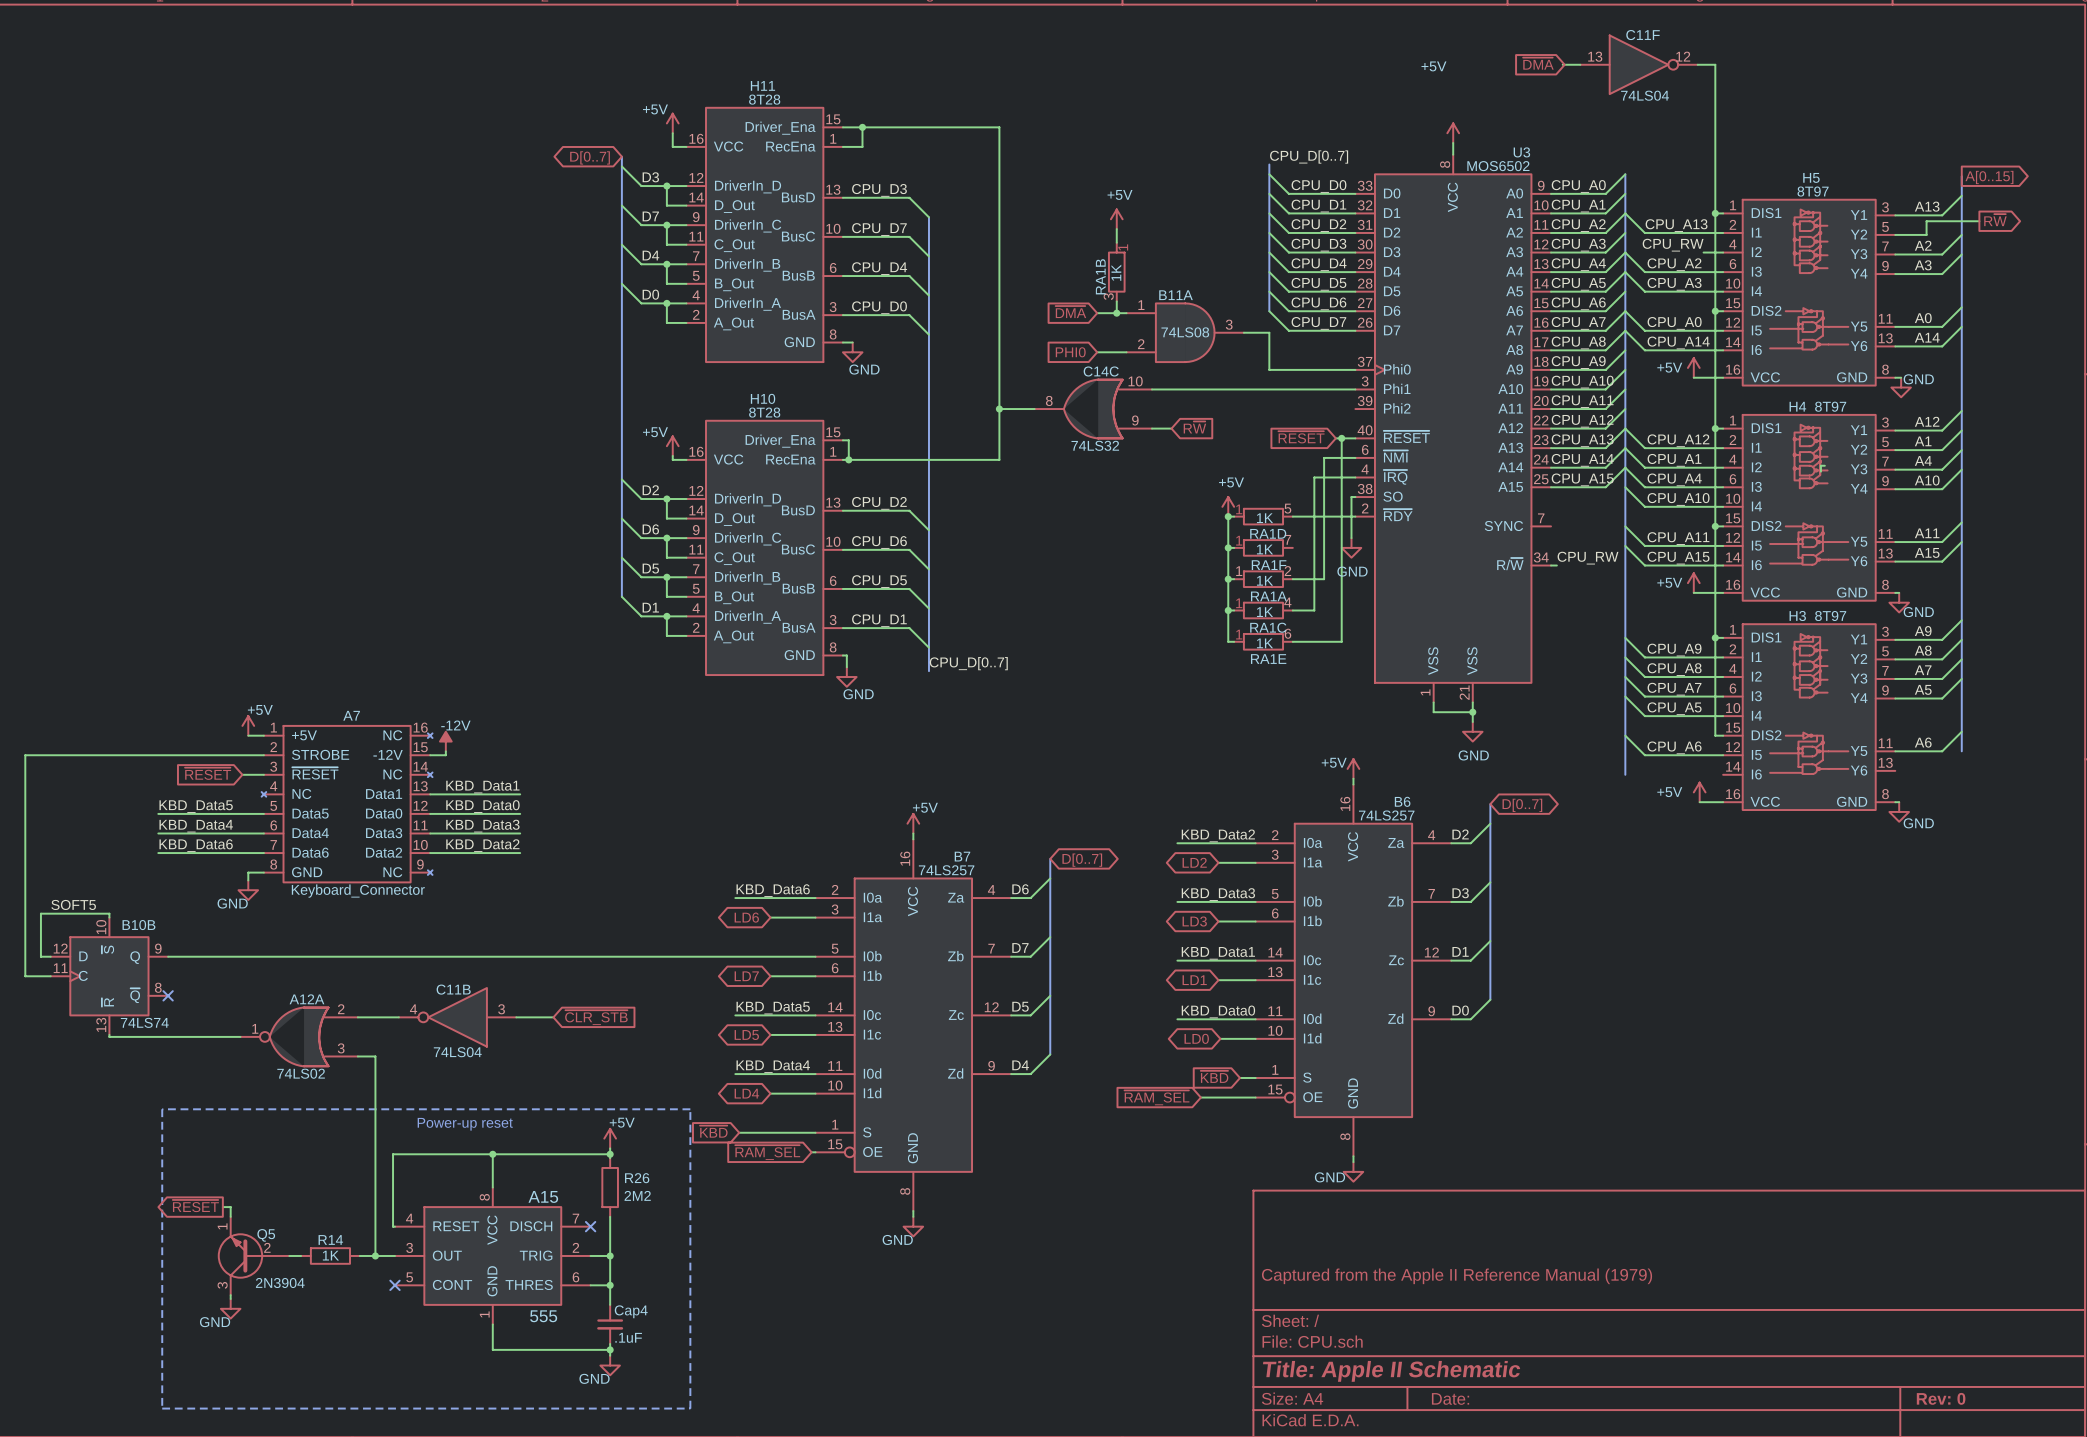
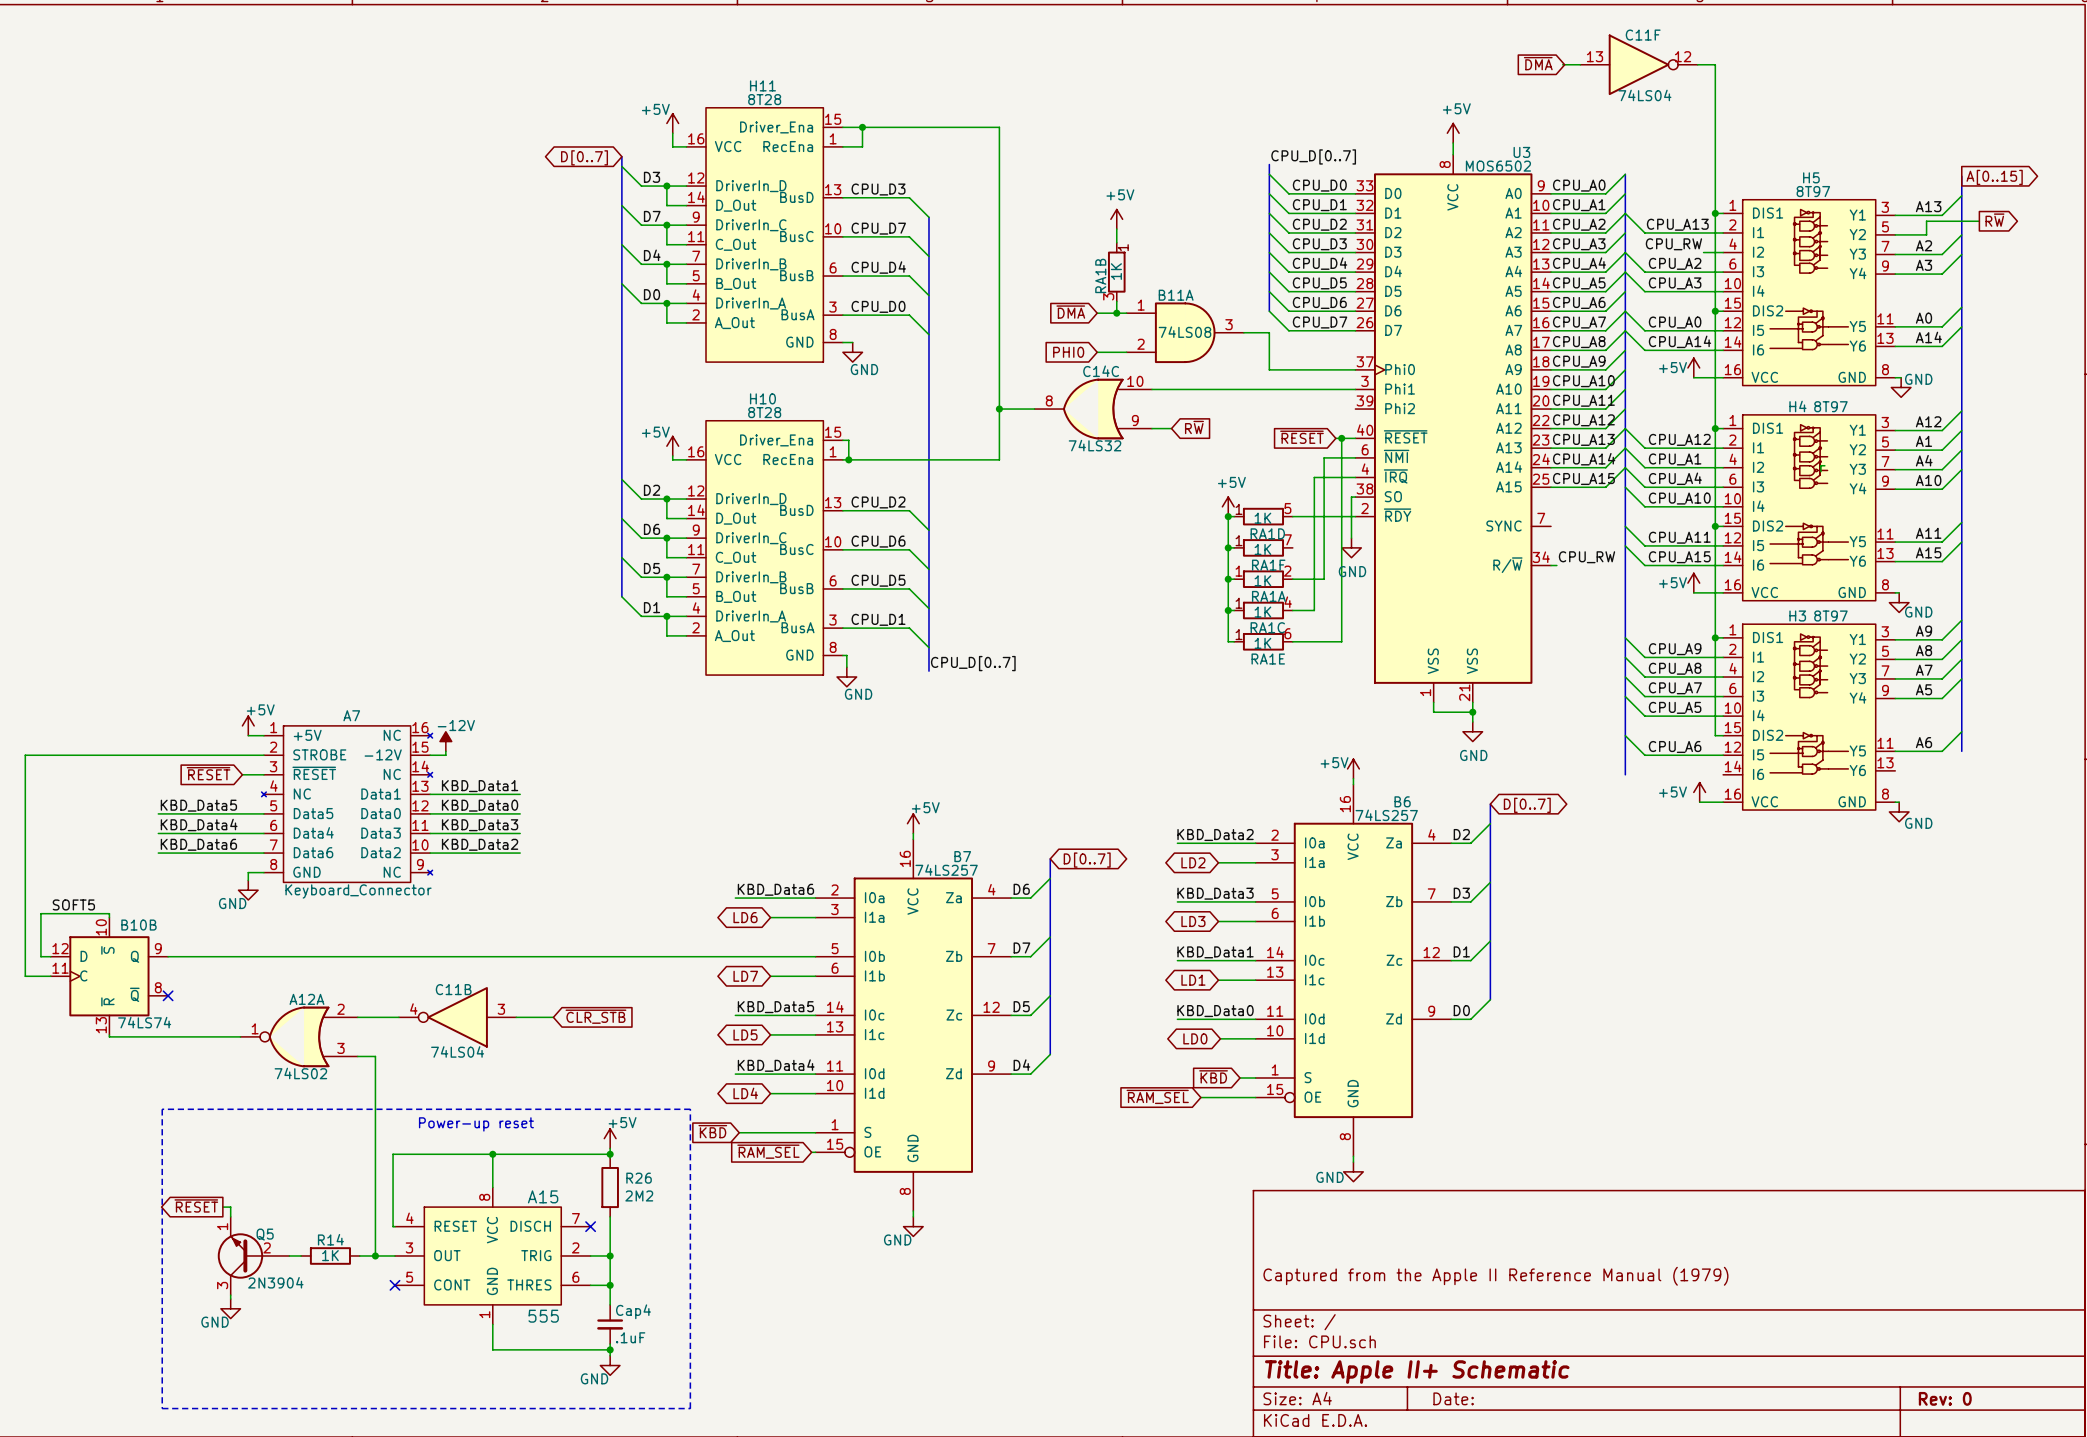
power symbol text position: +5V (1433, 66) -> +5V (1456, 108)
title block: Title: Apple II Schematic (1391, 1371) -> Title: Apple II+ Schematic (1417, 1372)

